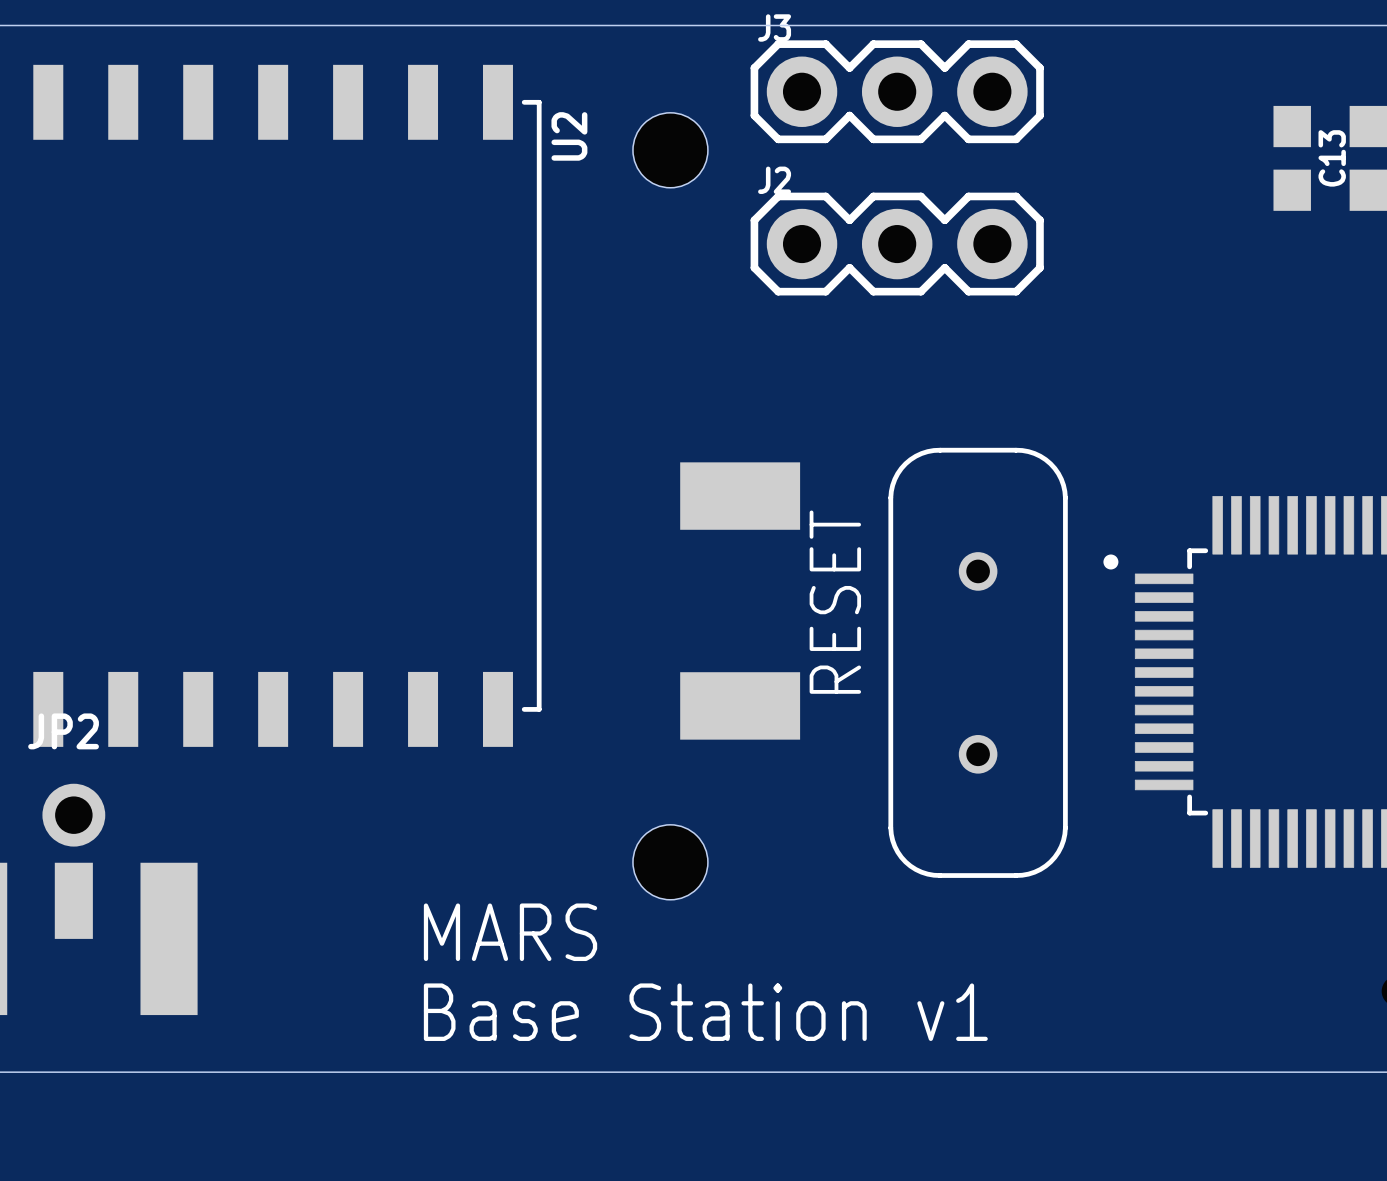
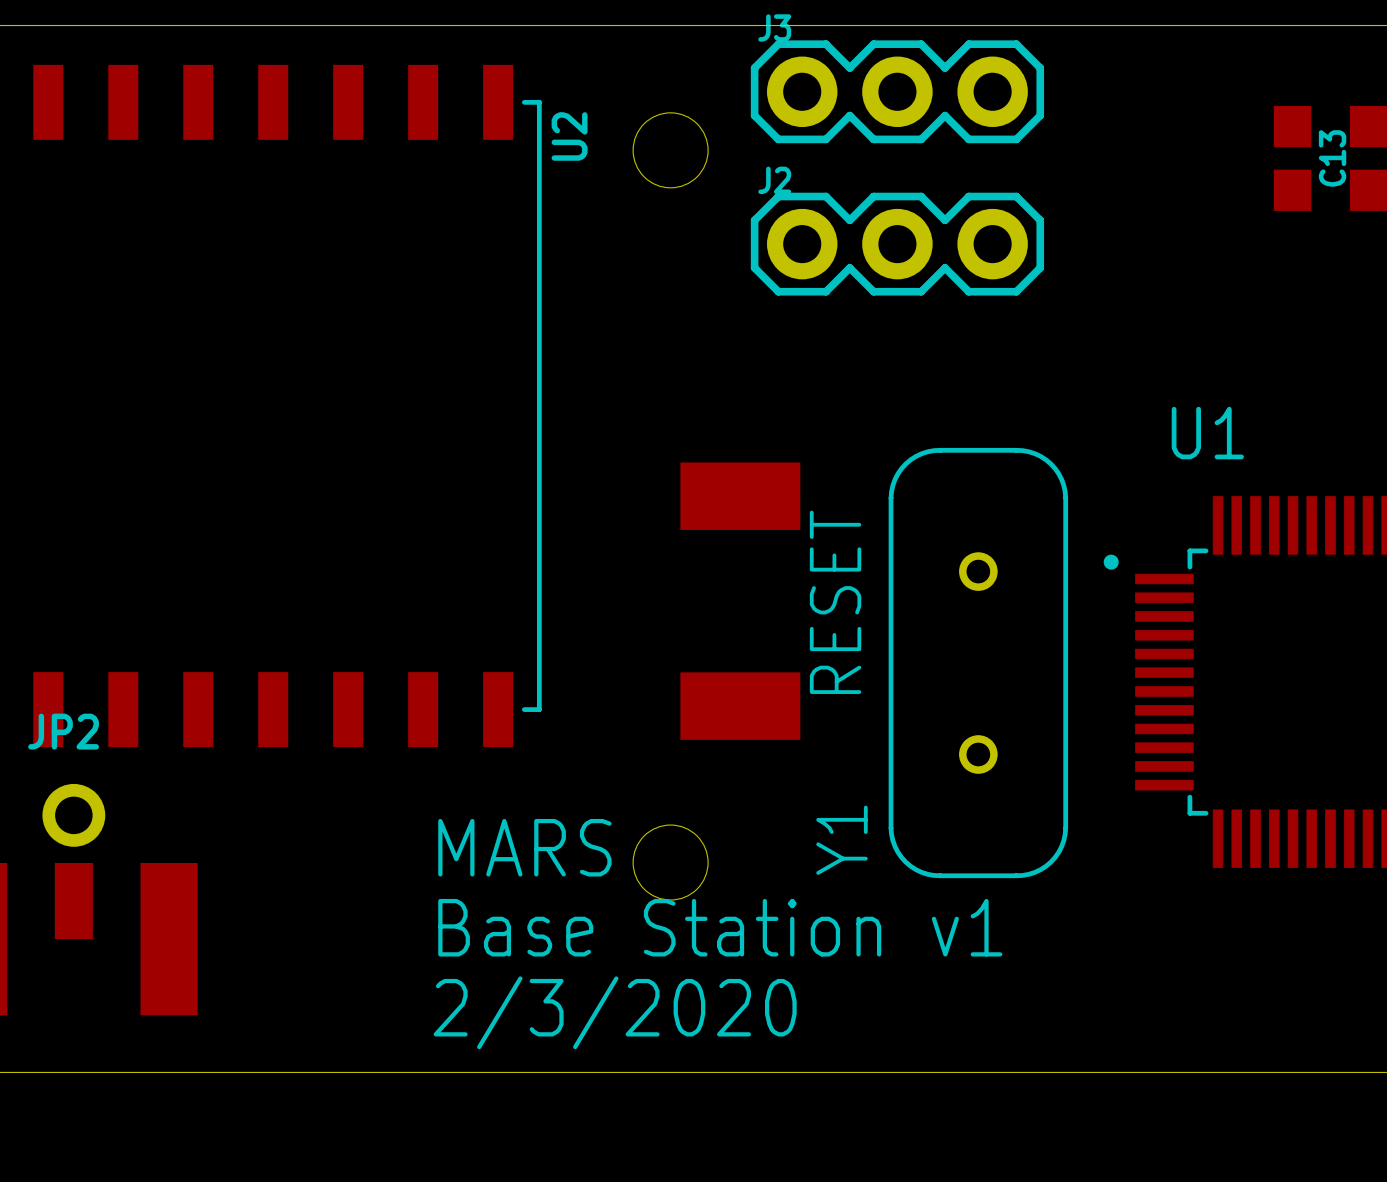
U1 name: none -> U1 (1207, 433)
Y1 name: none -> Y1 (841, 840)
text position: MARS (510, 932) -> MARS (524, 847)
text: none -> 2/3/2020 (615, 1012)
text position: Base Station v1 (705, 1012) -> Base Station v1 (720, 927)

